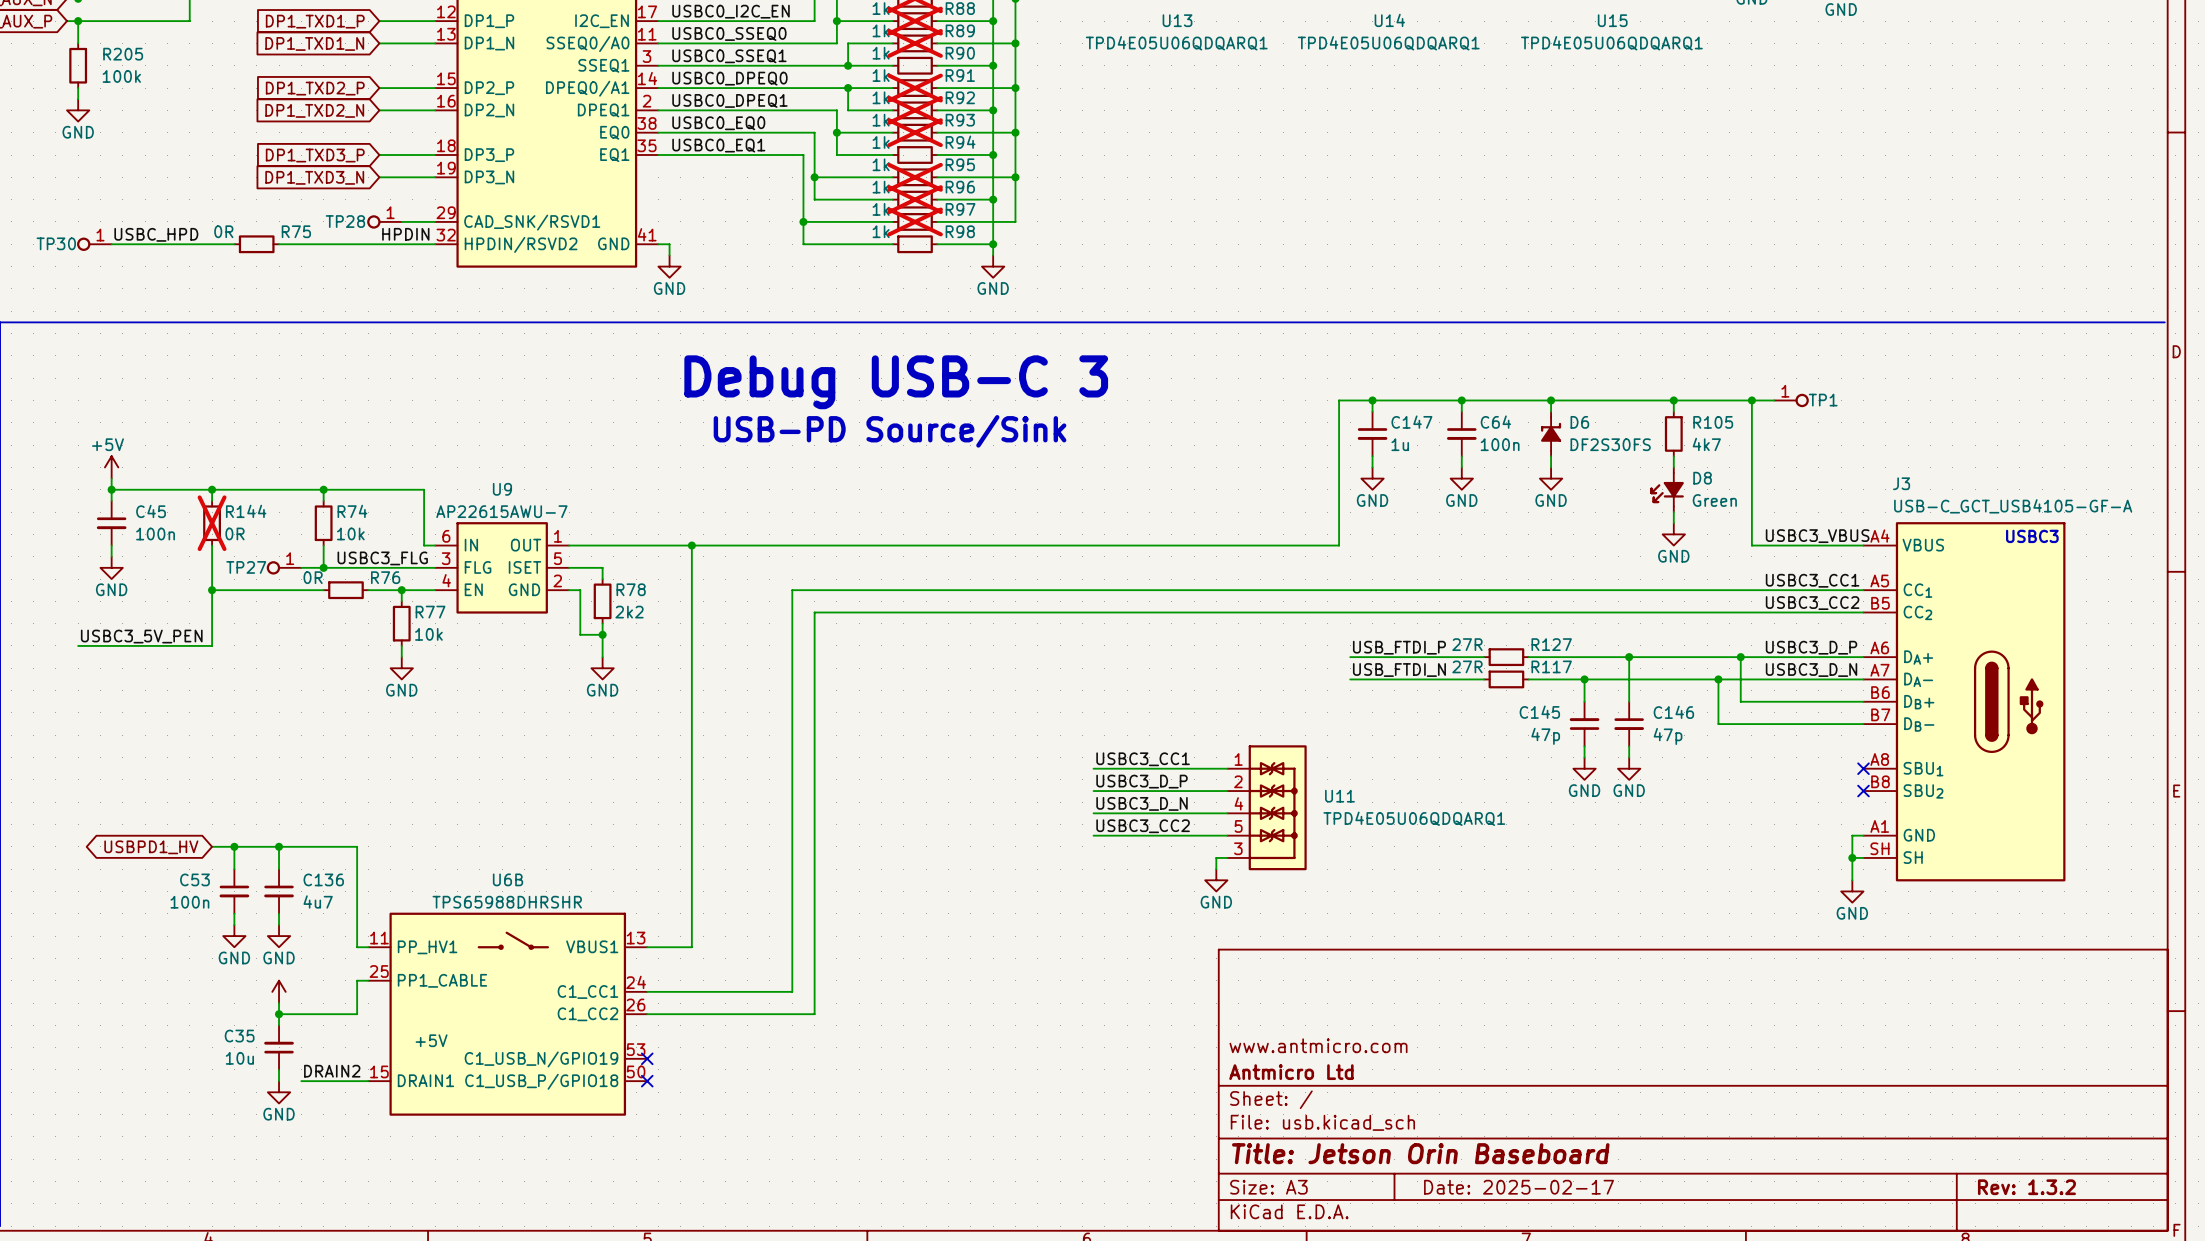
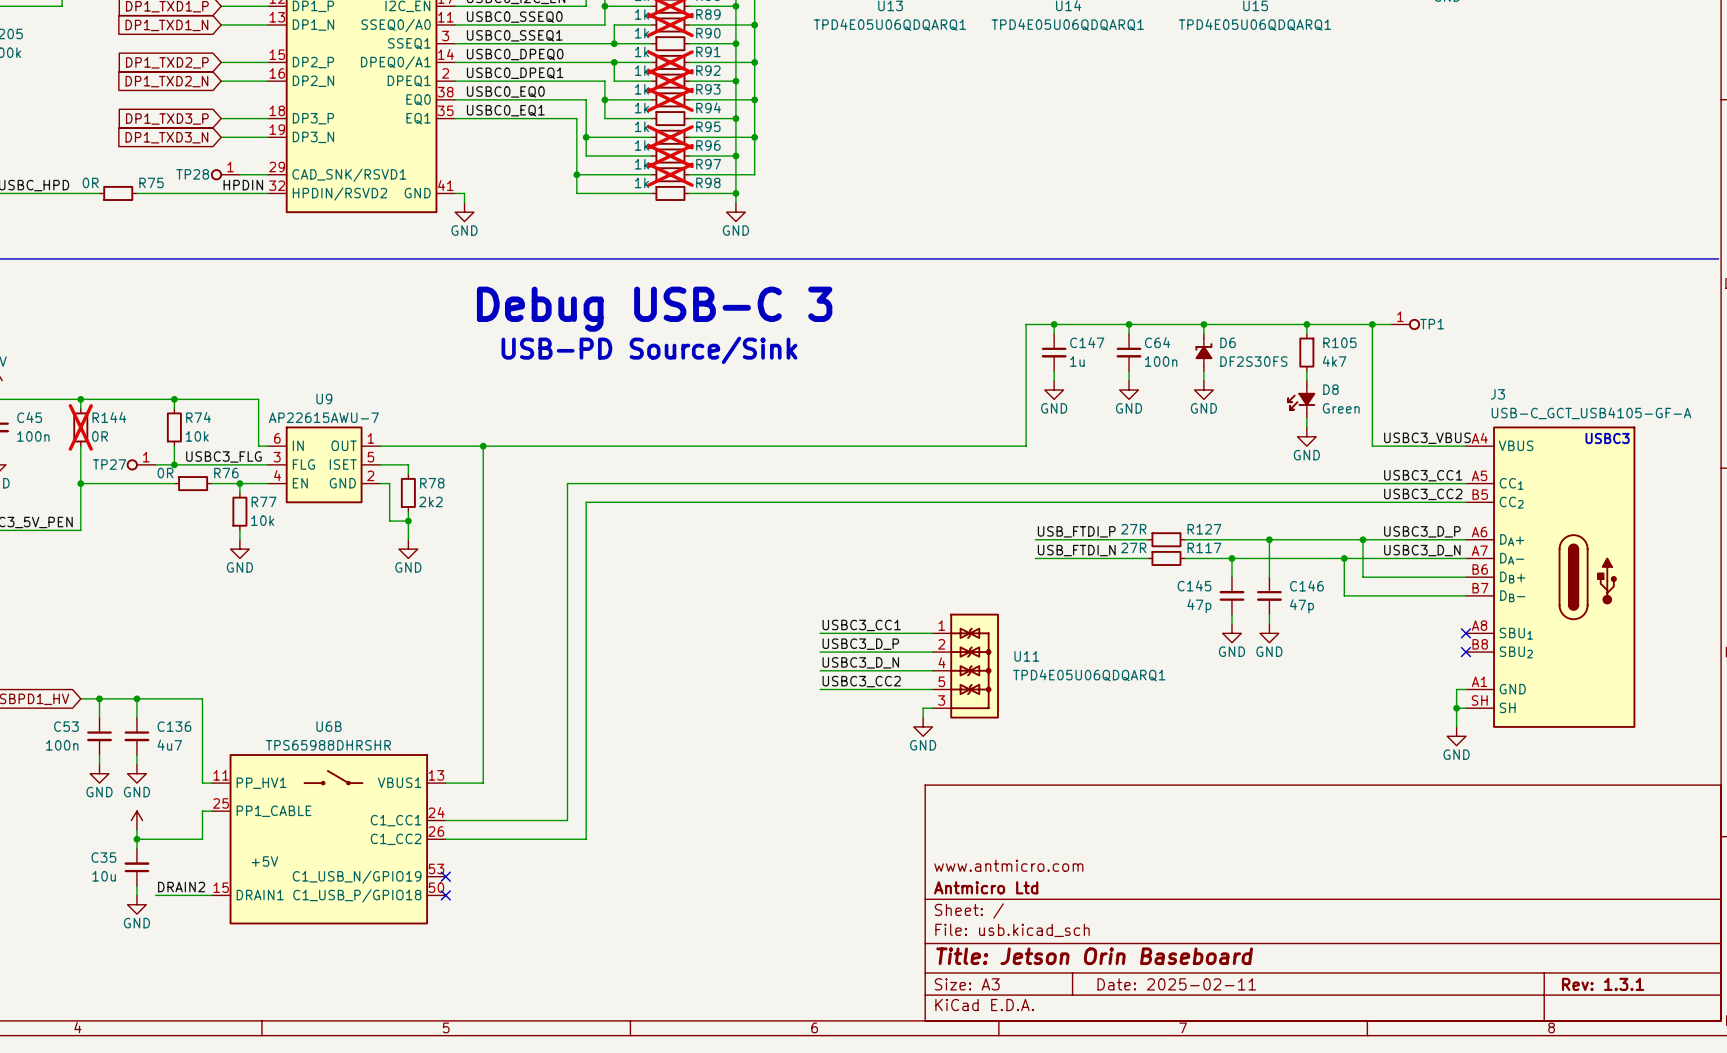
title block: Date: 2025-02-17 (1519, 1187) -> Date: 2025-02-11 (1176, 984)
title block: Rev: 1.3.2 (2026, 1187) -> Rev: 1.3.1 (1603, 984)

